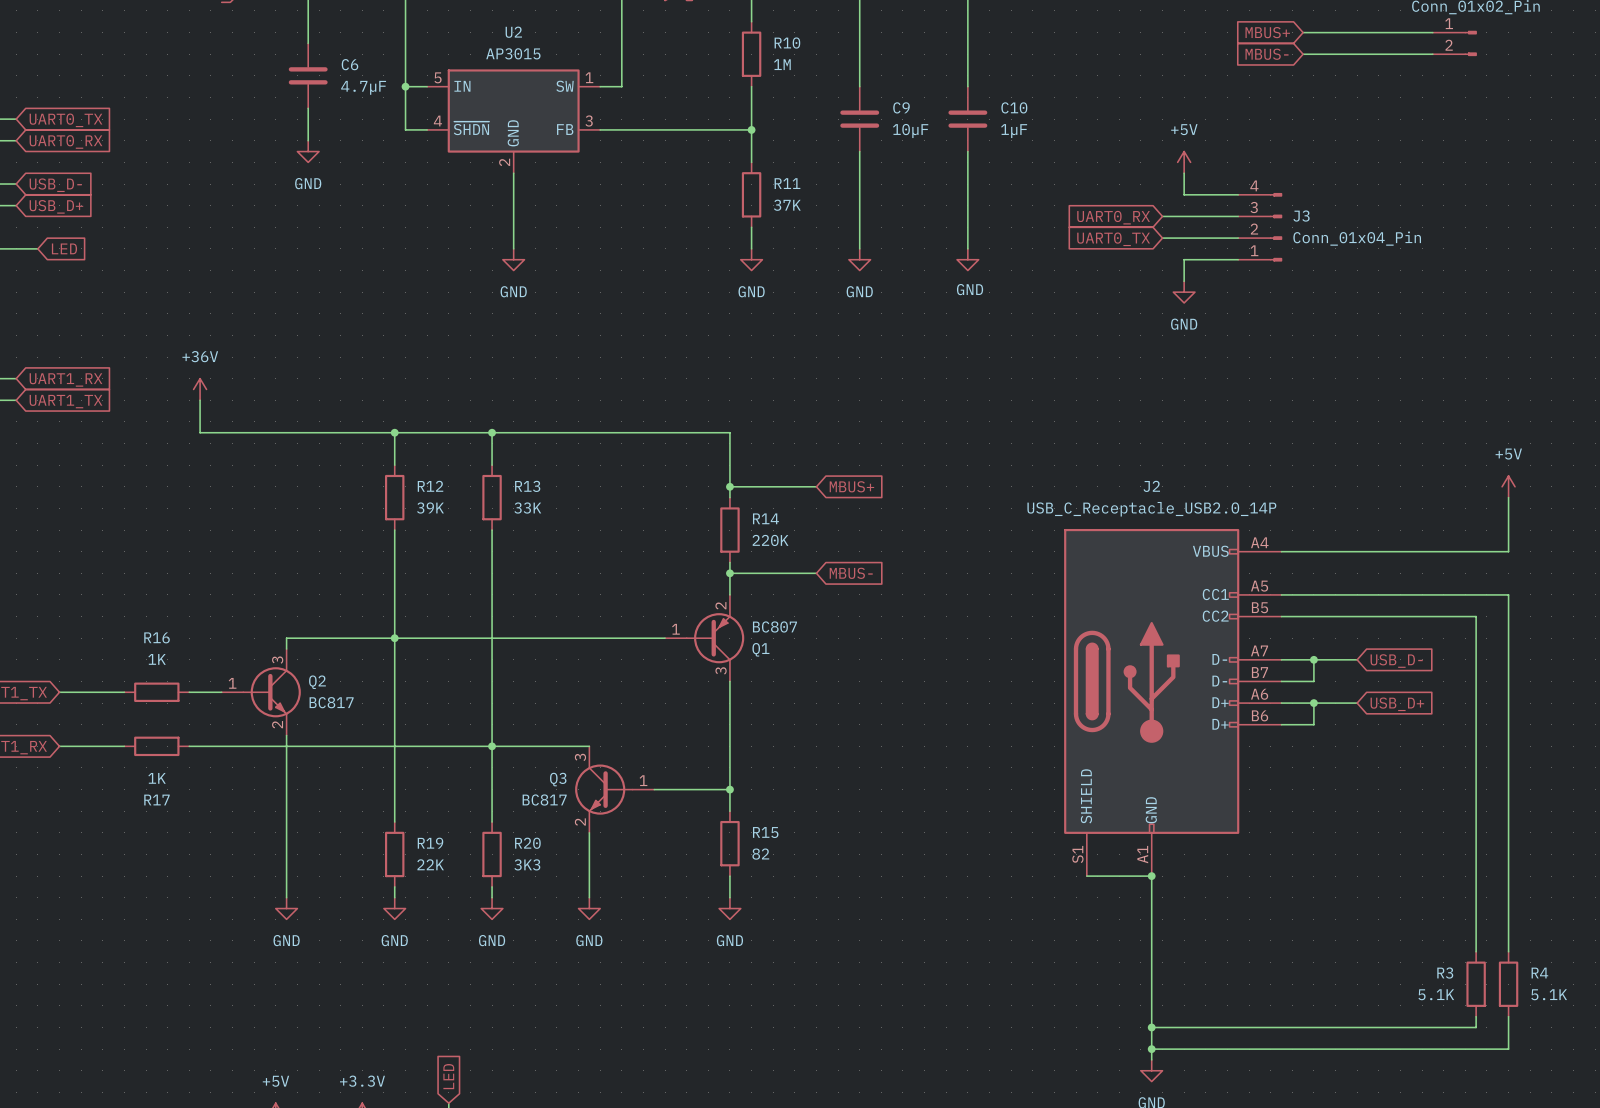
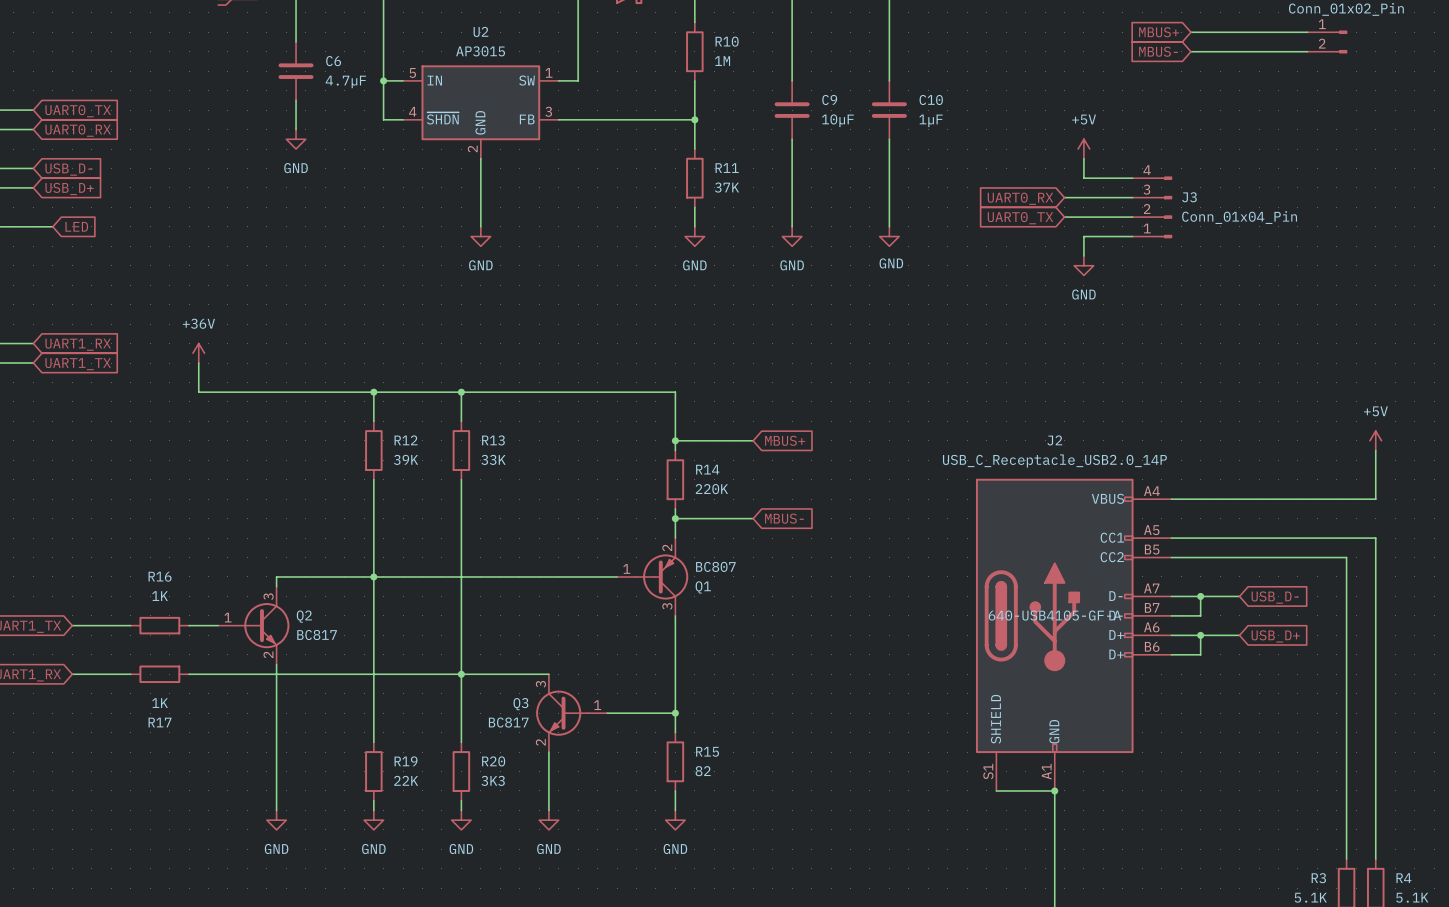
J2 text: none -> 640-USB4105-GF-A (1054, 615)

